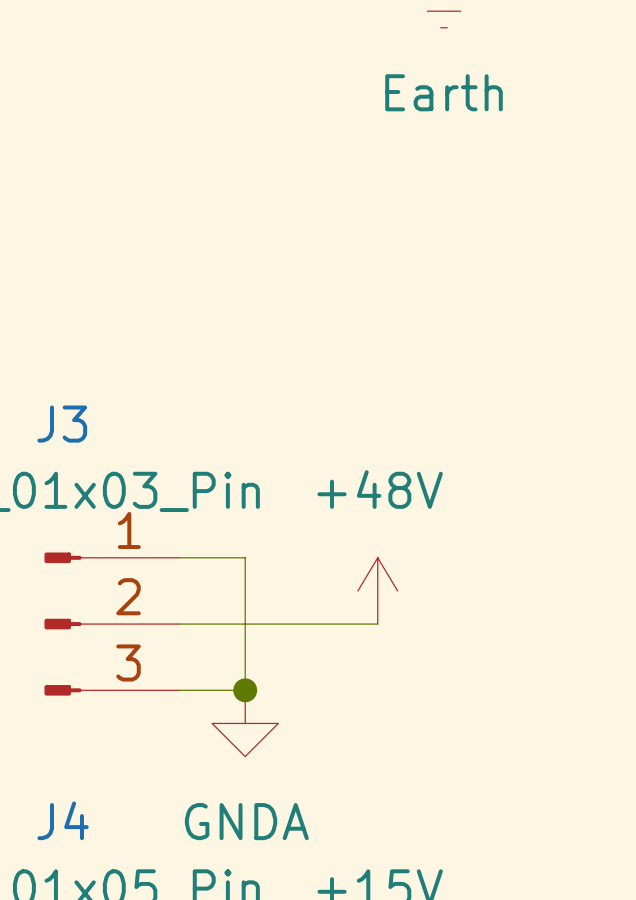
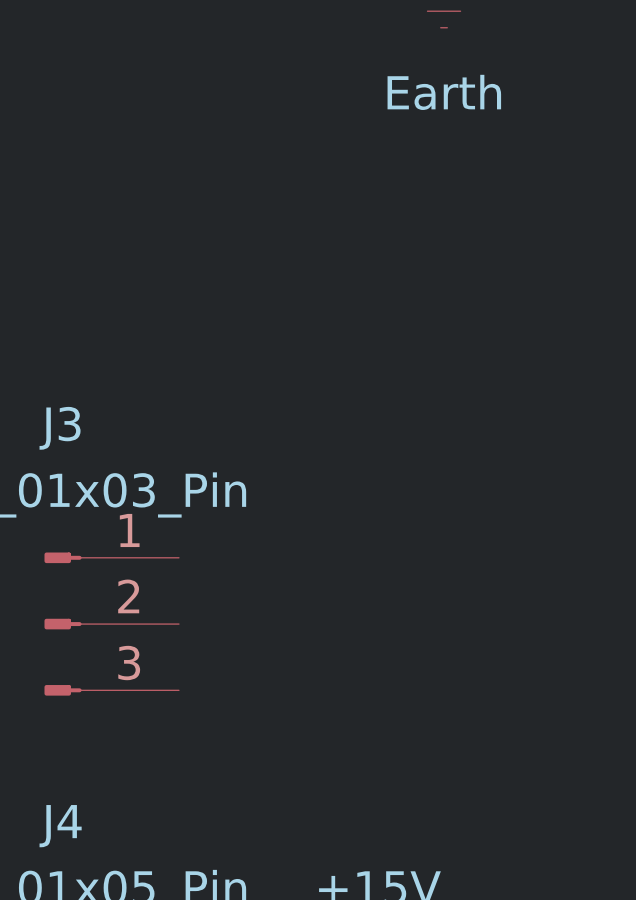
wire: (178, 557) (245, 557) (245, 690) (178, 690) -> none
power symbol: +48V (377, 590) -> none
wire: (178, 624) (377, 624) -> none
junction: (245, 690) -> none
power symbol: GNDA (245, 723) -> none

